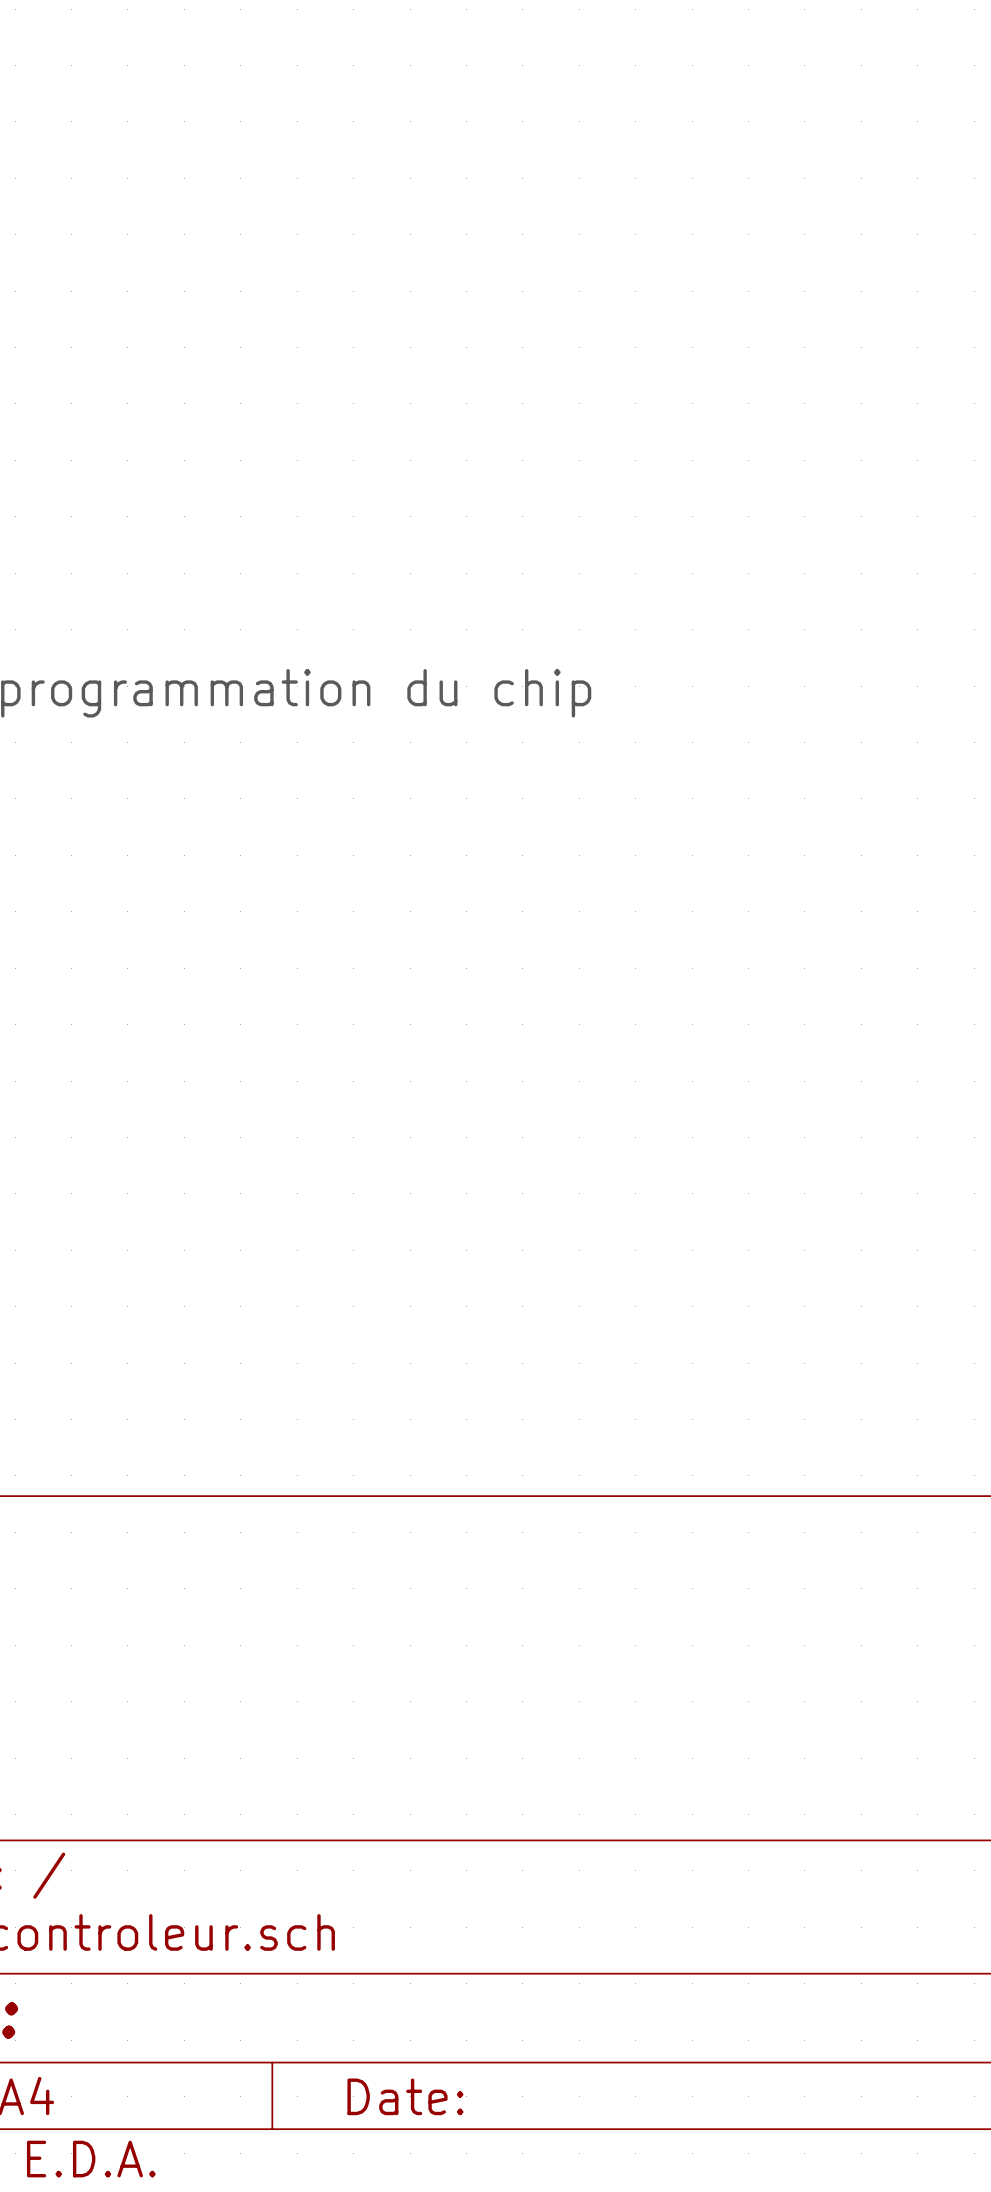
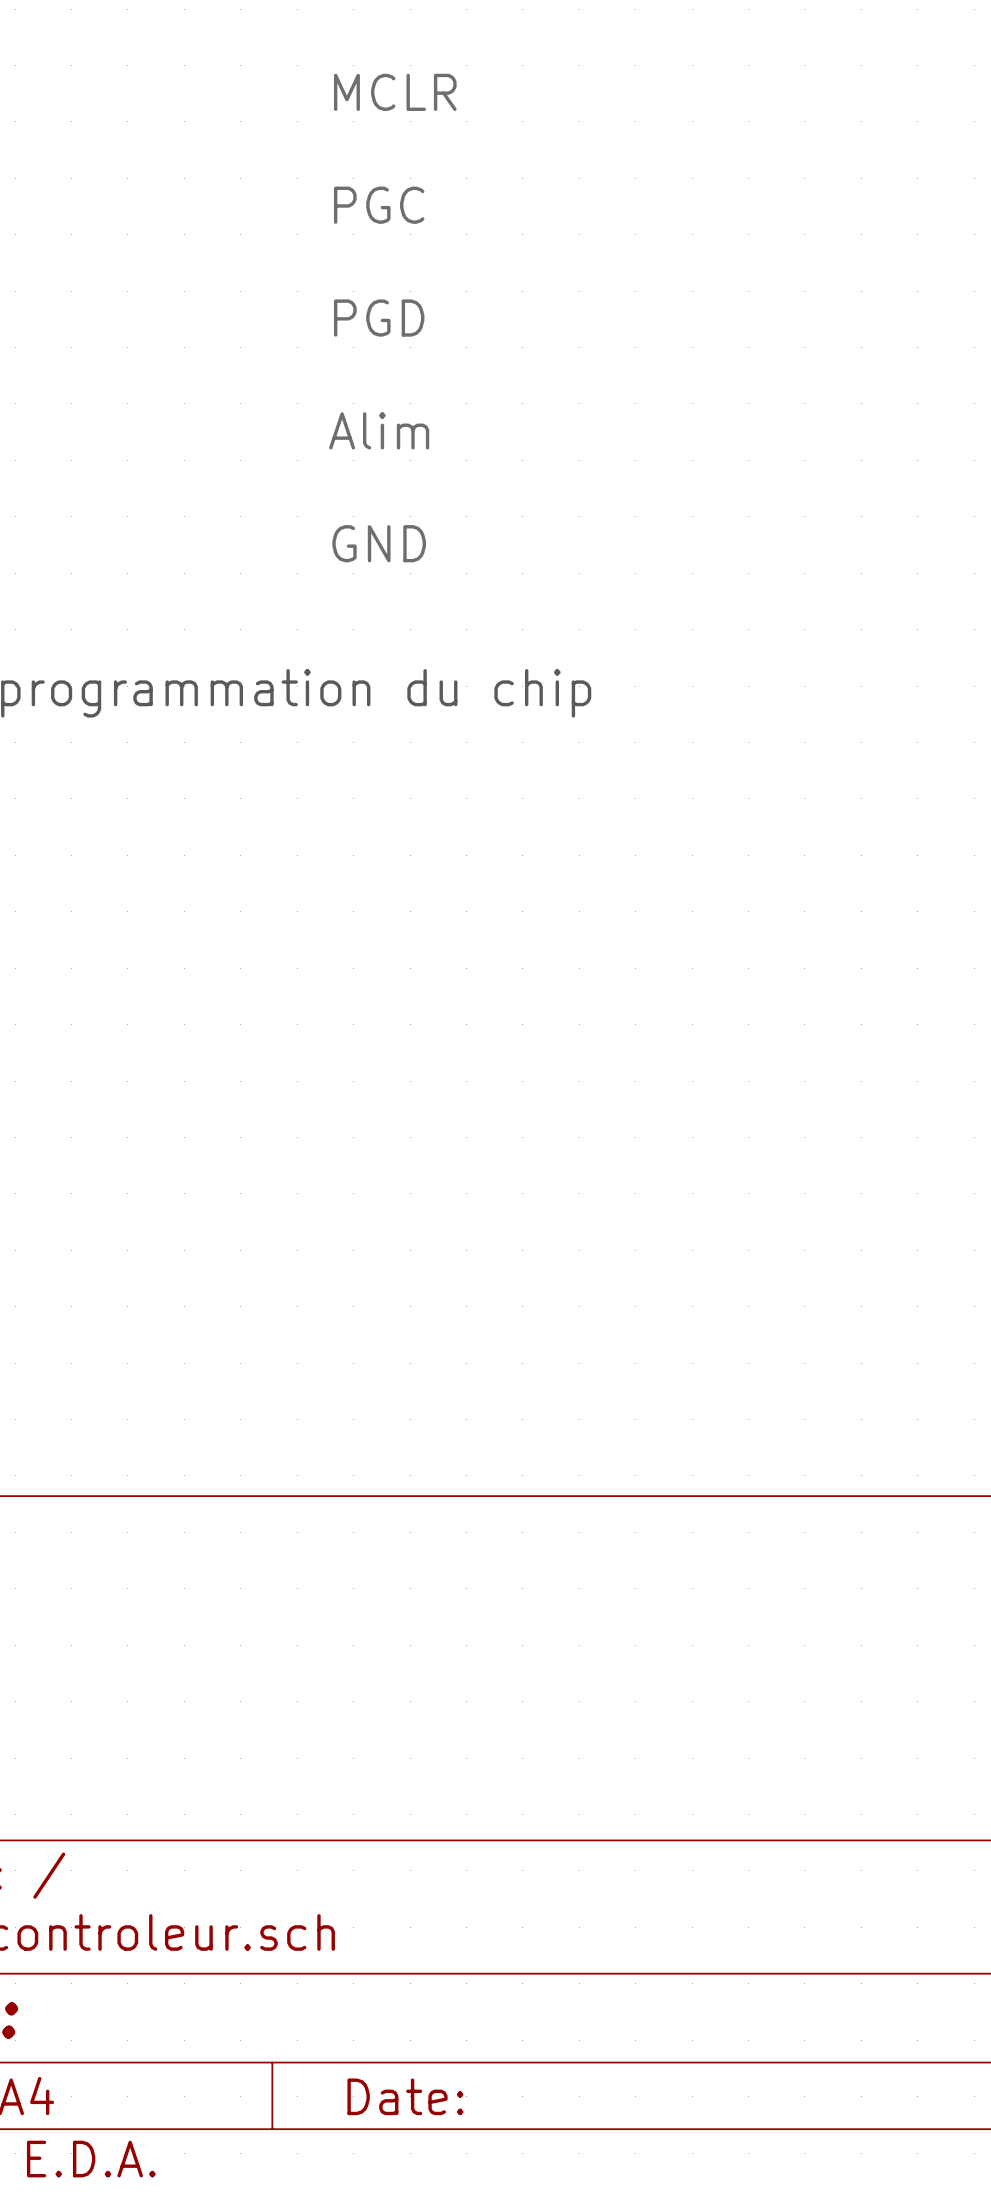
label: none -> MCLR (395, 92)
label: none -> PGC (379, 205)
label: none -> PGD (379, 318)
label: none -> Alim (379, 430)
label: none -> GND (379, 543)

